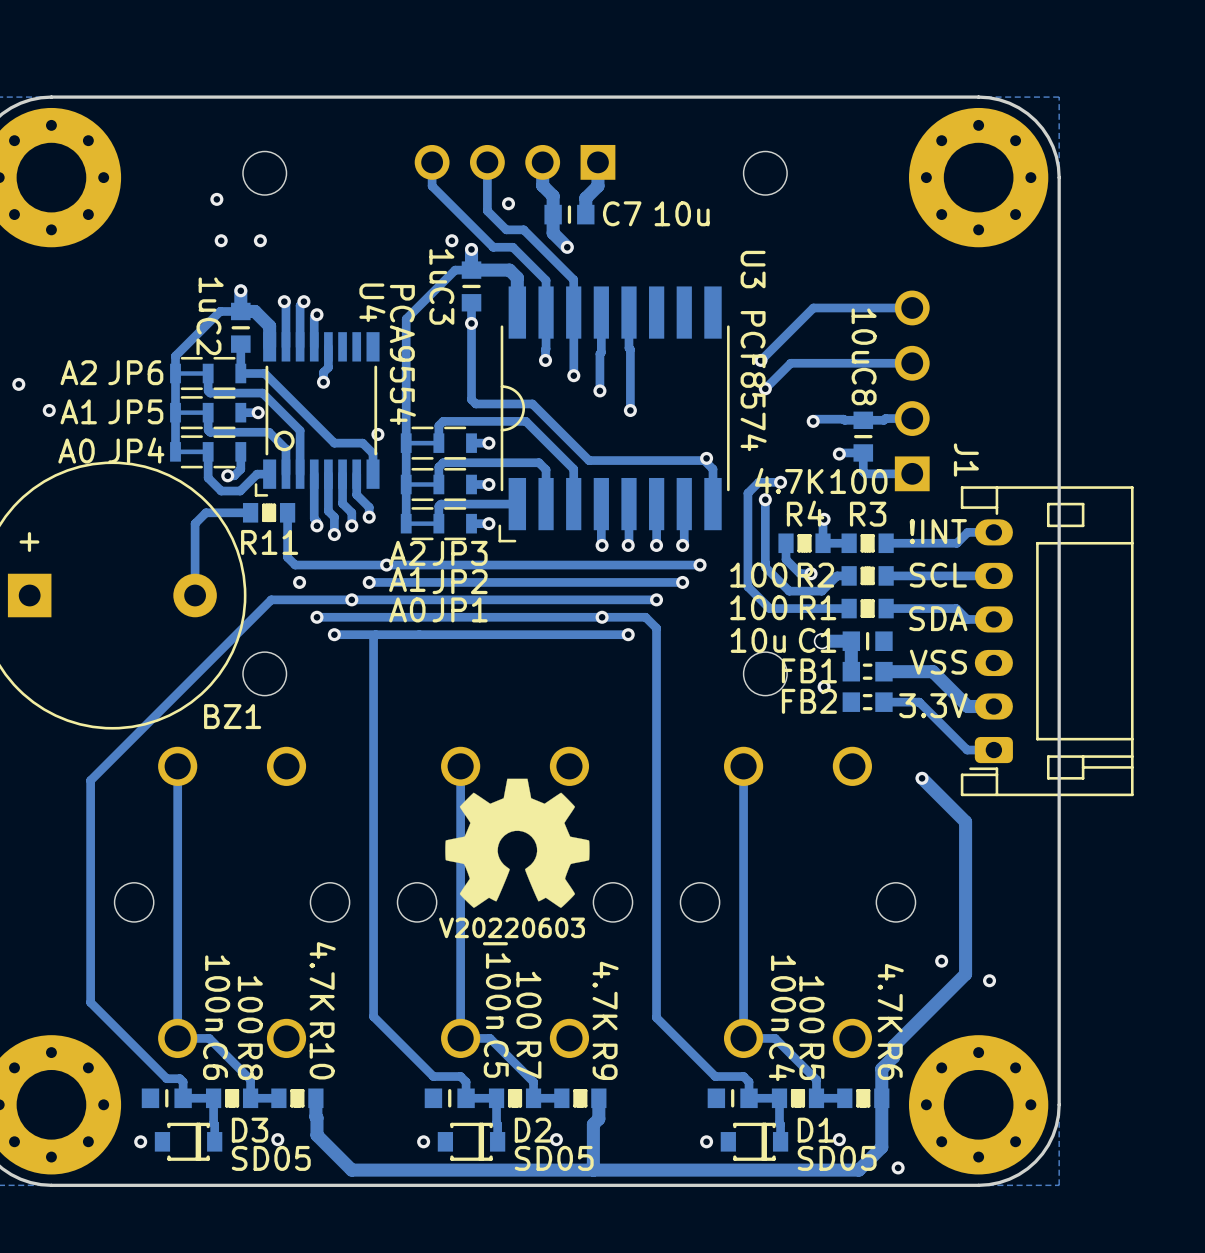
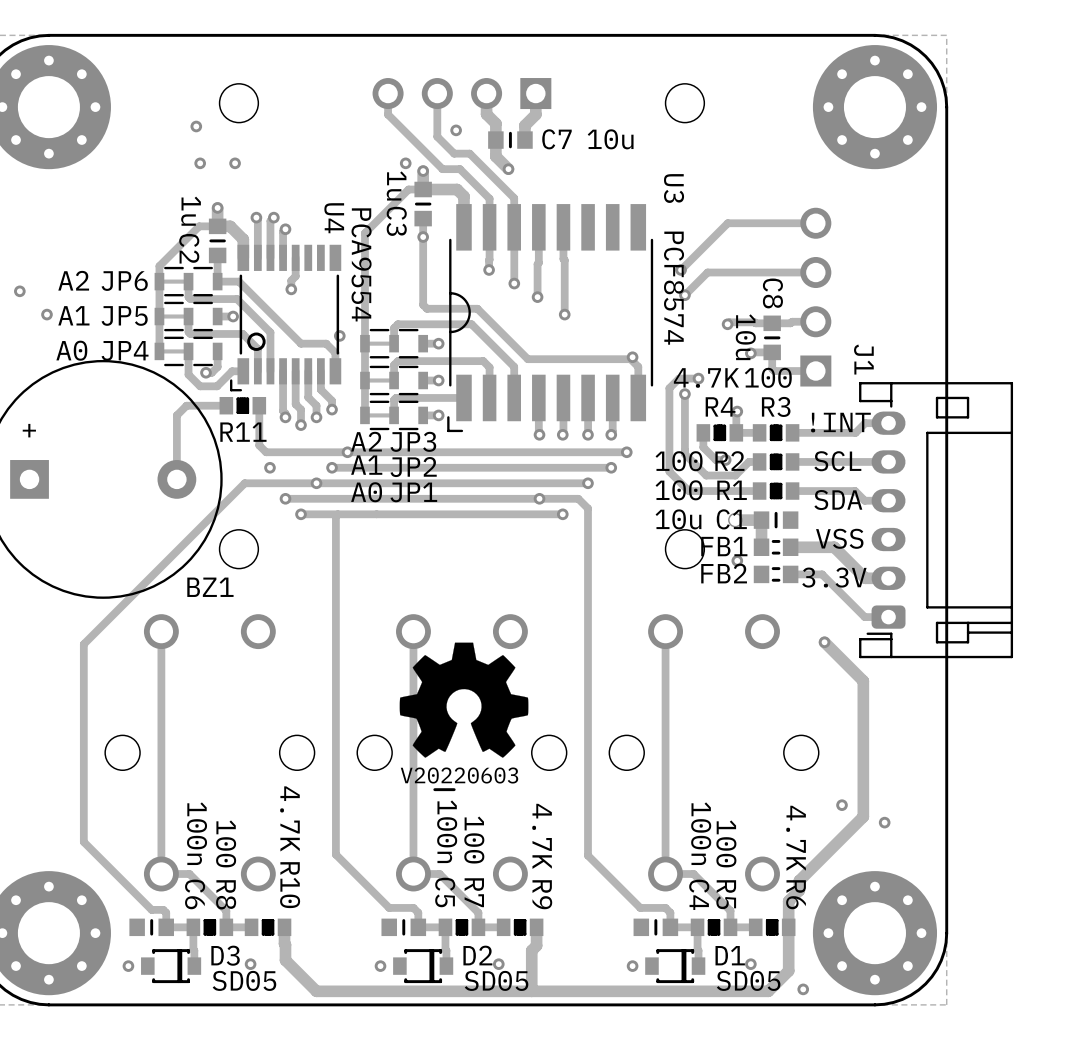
C8 value position: 10u (864, 335) -> 10u (745, 337)

